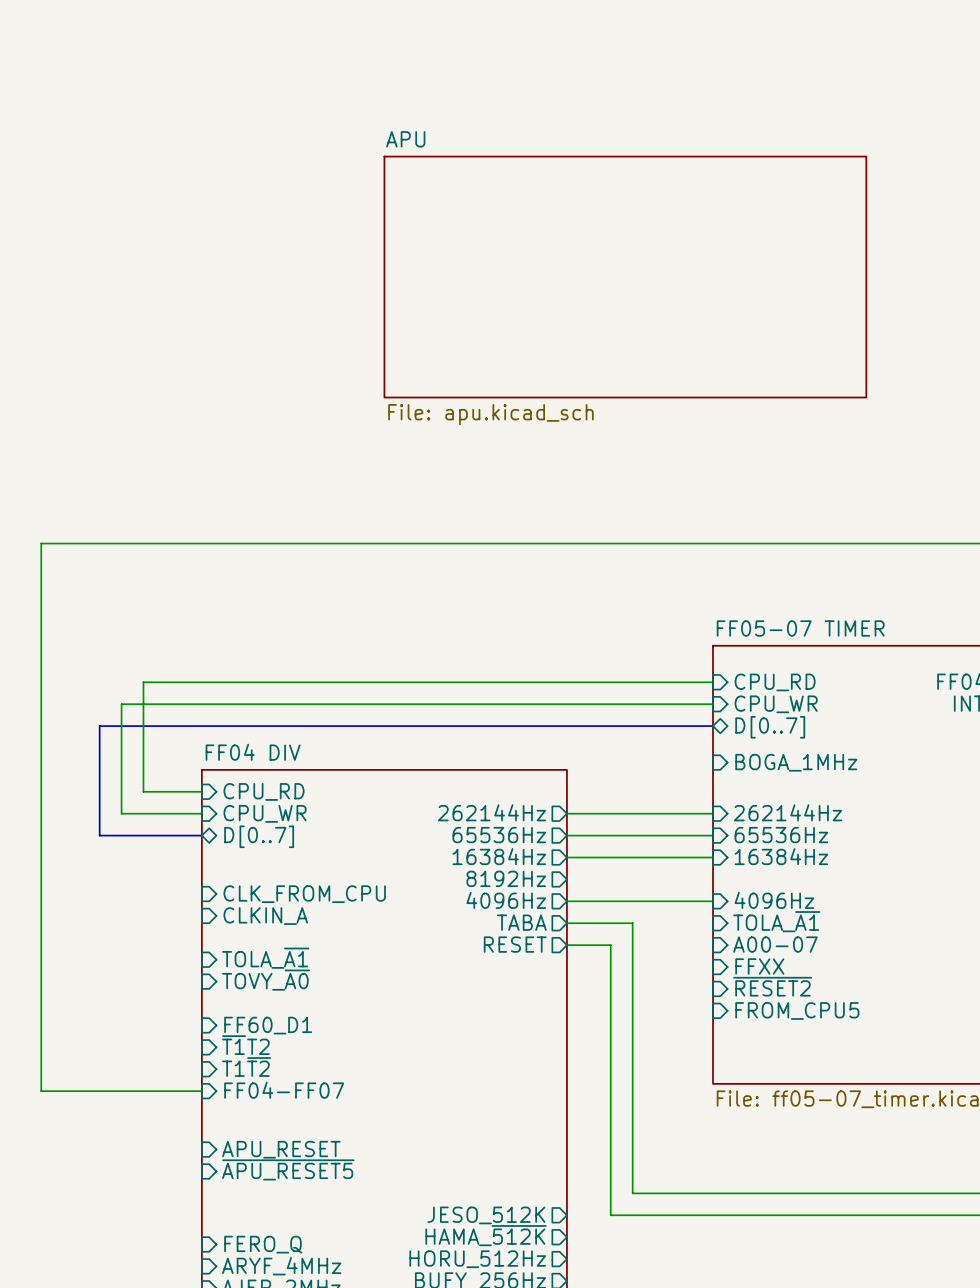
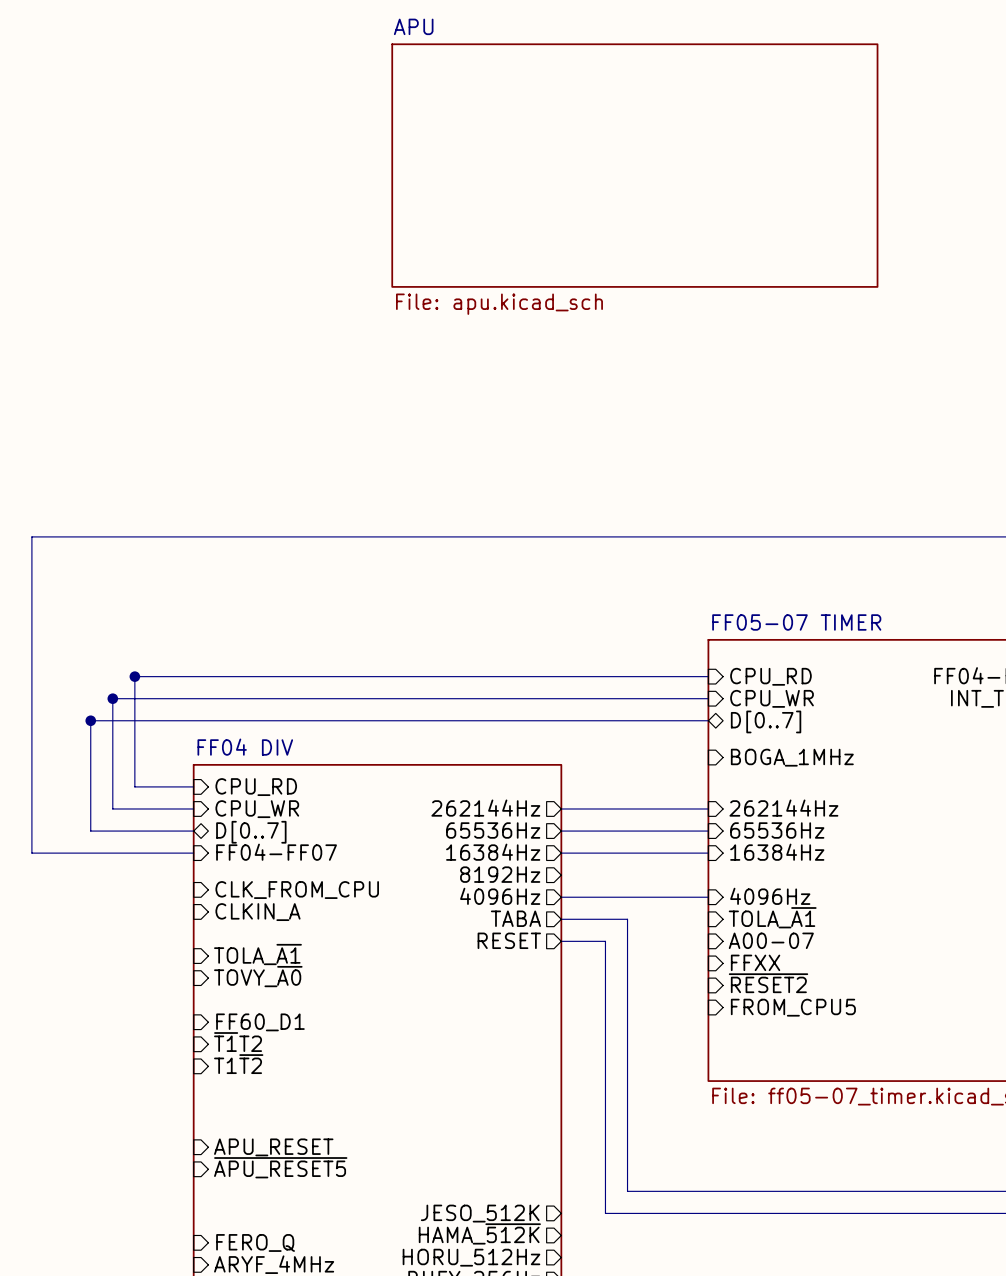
sheet APU position: (625, 277) -> (634, 165)
junction: none -> (134, 676)
junction: none -> (112, 698)
junction: none -> (90, 720)
wire: (41, 857) (41, 1091) (201, 1091) -> (31, 853) (193, 853)
sheet pin position: FF04-FF07 (284, 1090) -> FF04-FF07 (276, 852)

